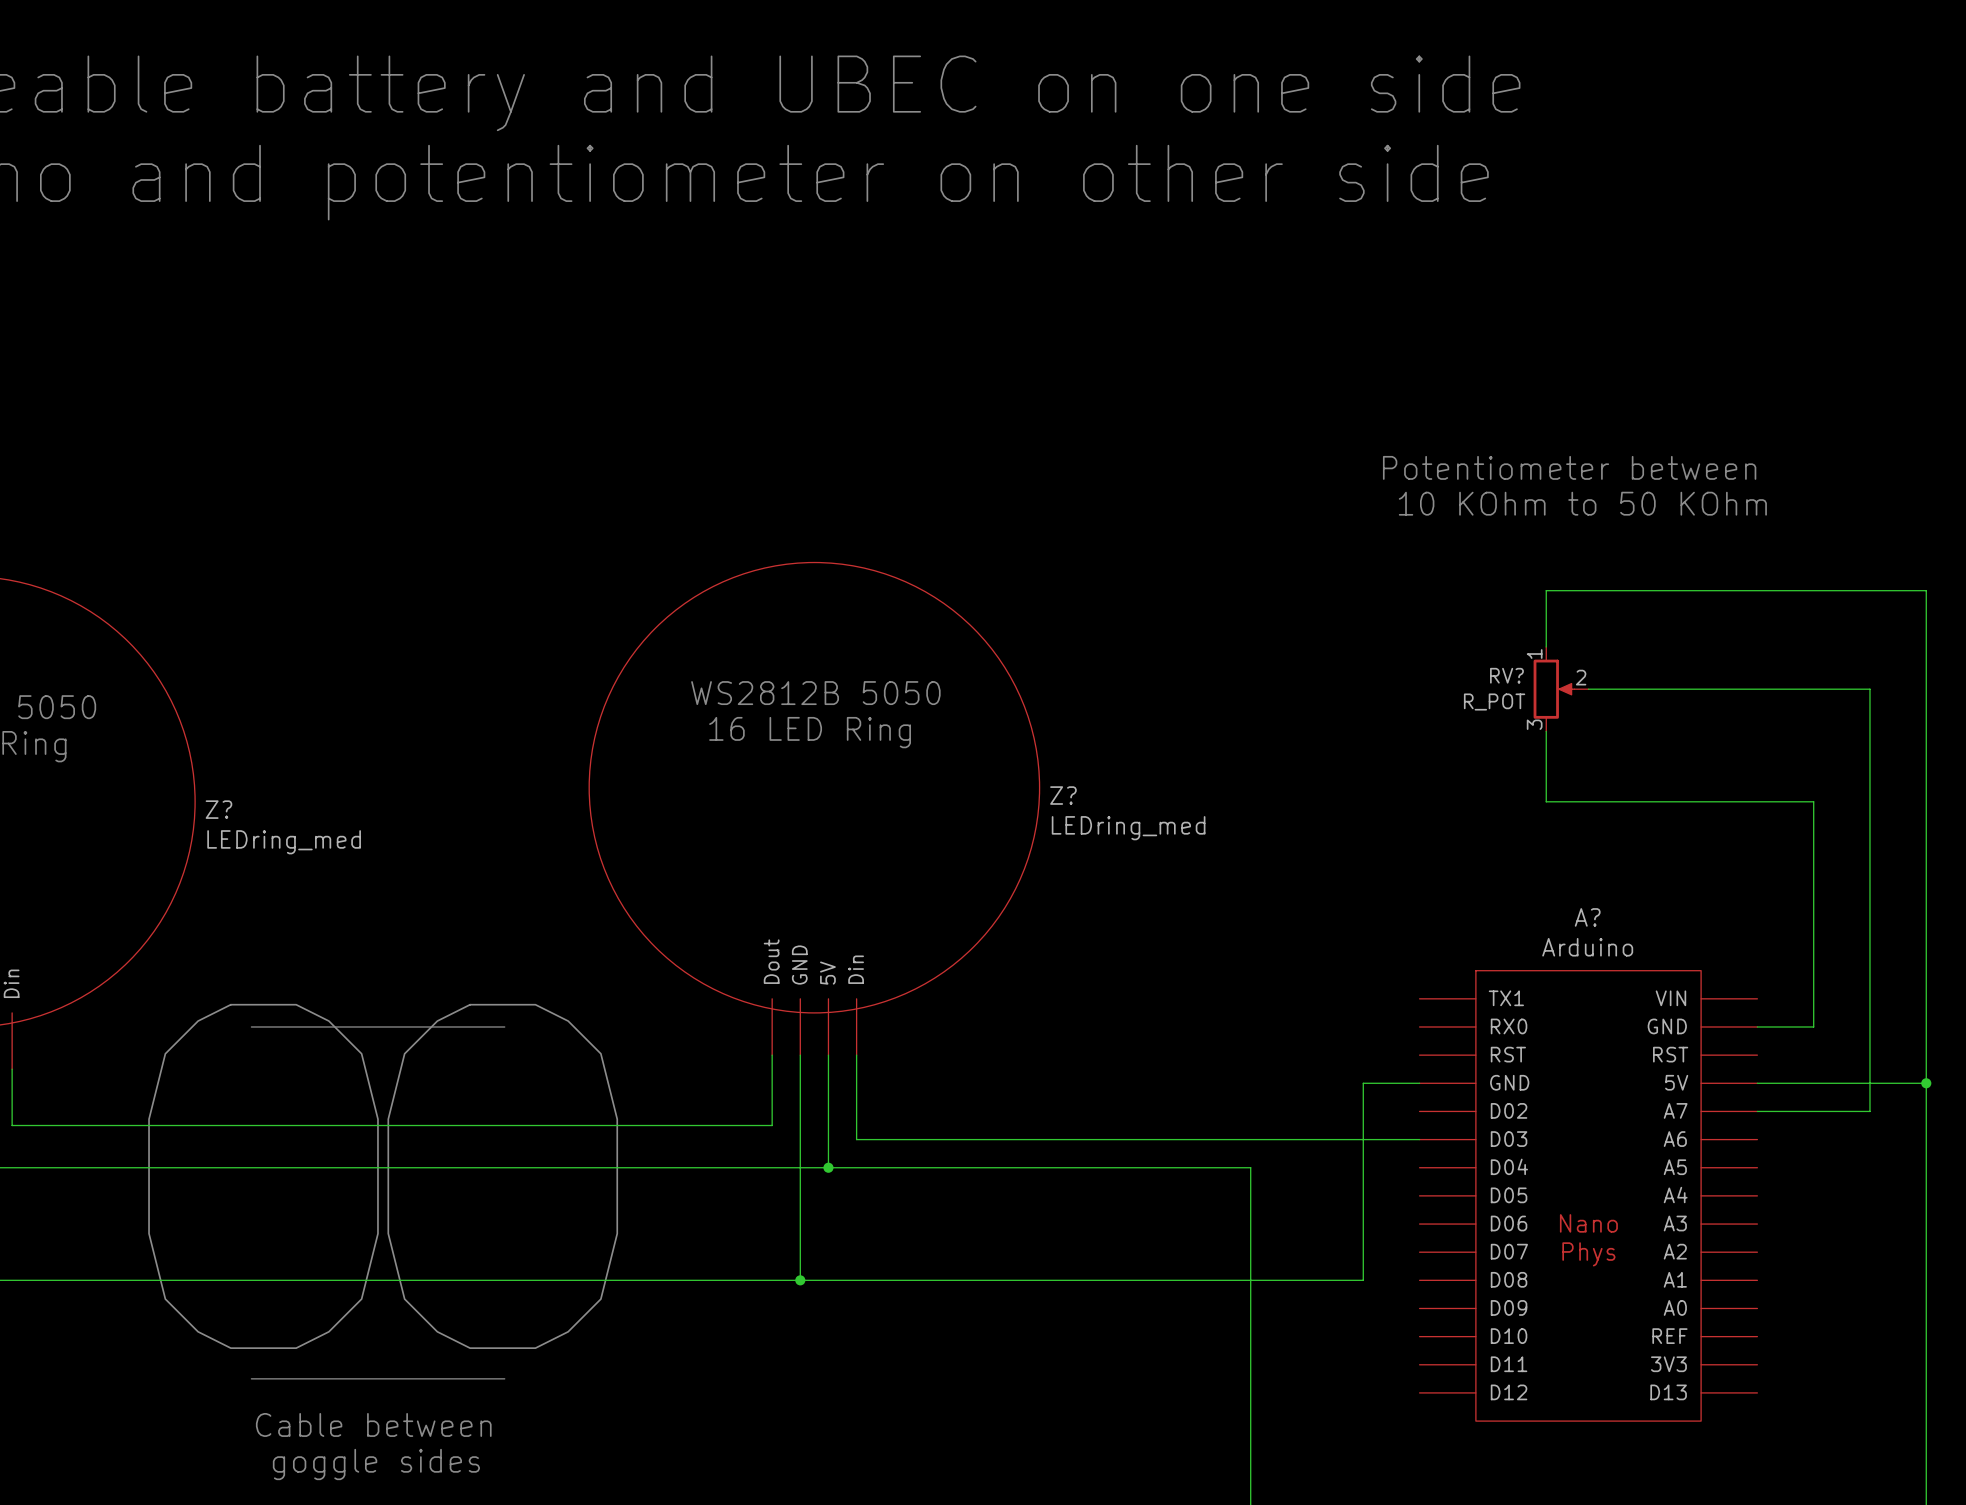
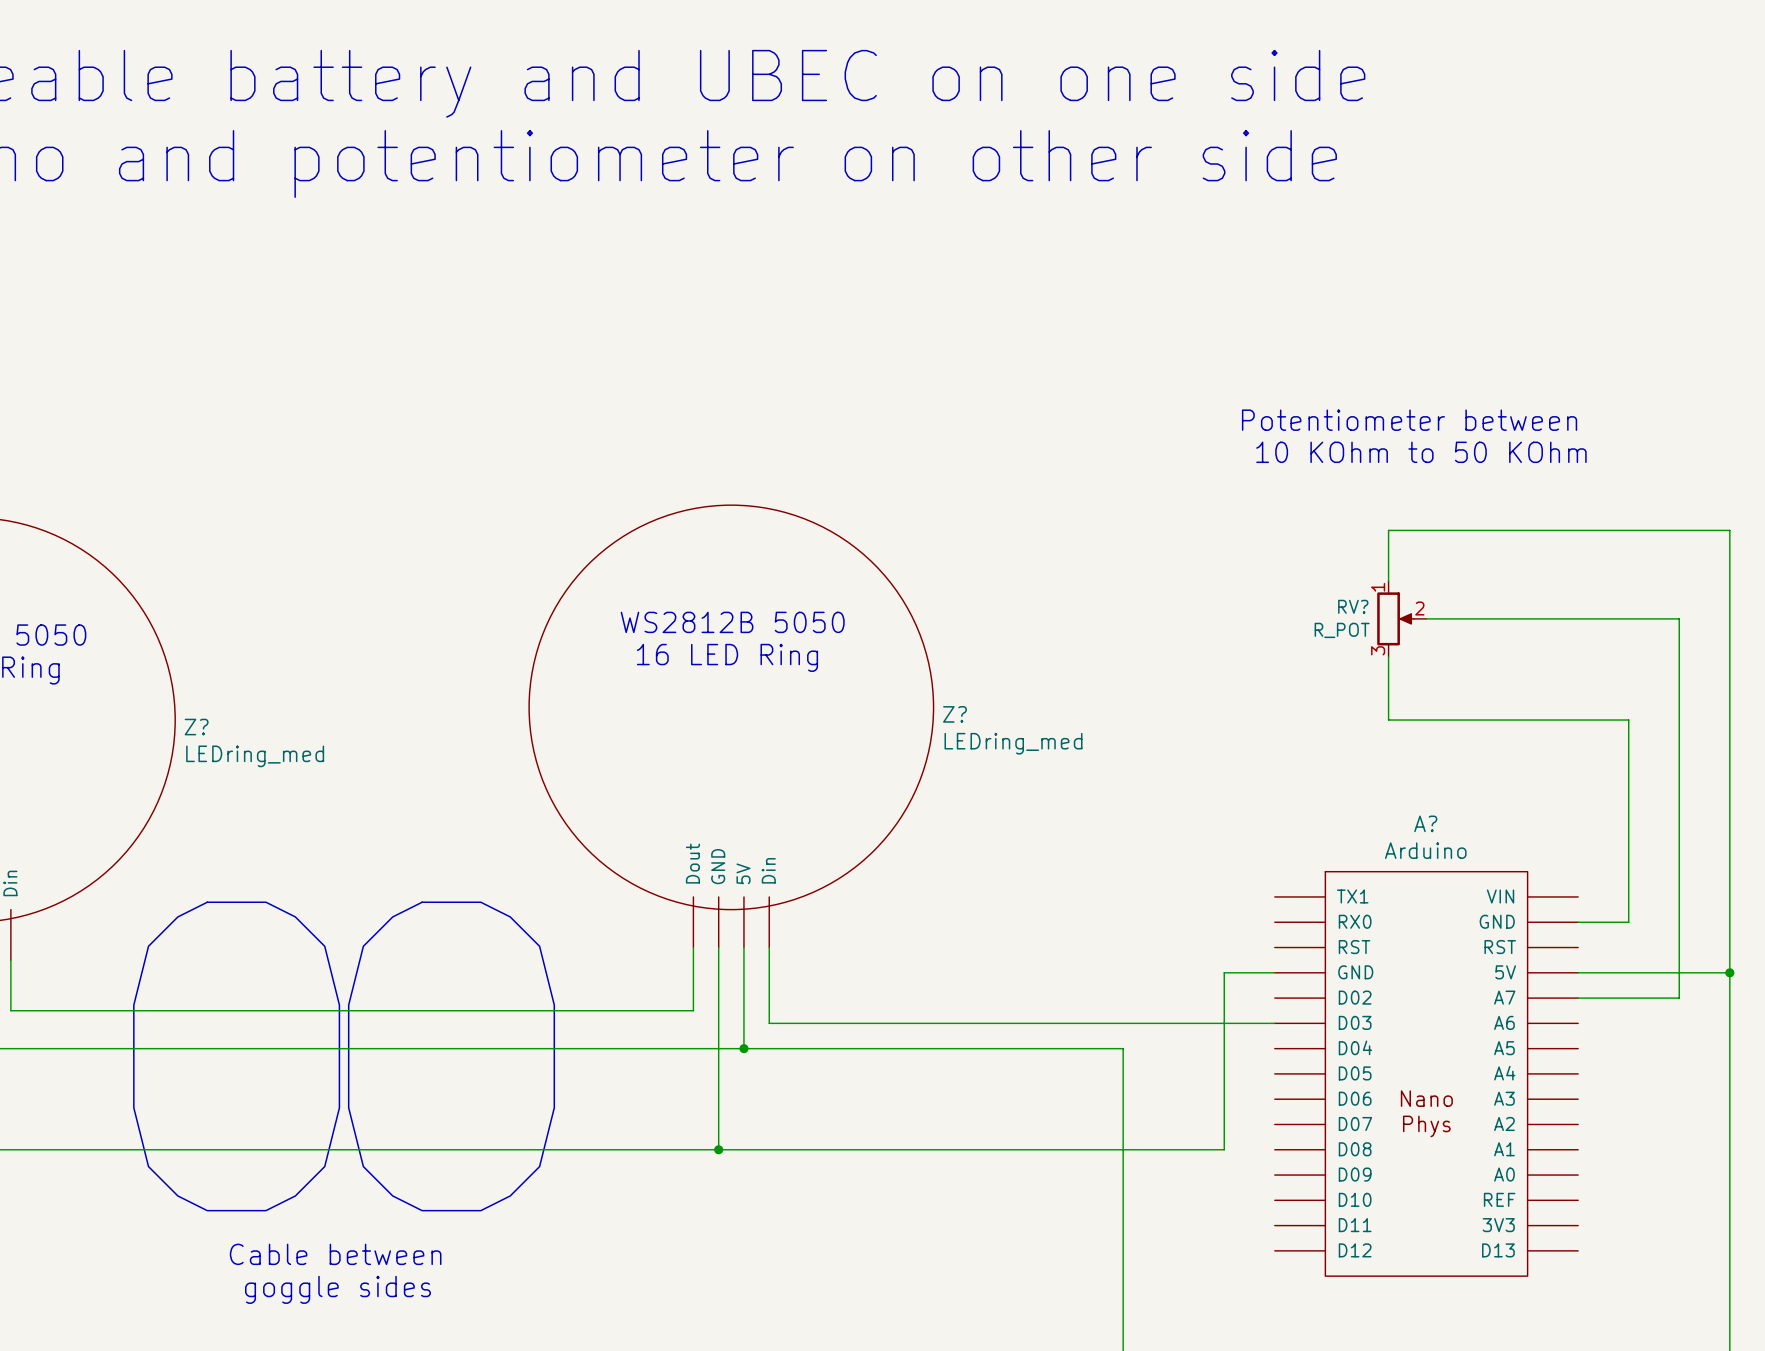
bus: (251, 1026) (504, 1026) -> none
bus: (251, 1378) (504, 1378) -> none
text position: Cable between (373, 1424) -> Cable between (335, 1254)
text position: goggle sides (376, 1464) -> goggle sides (338, 1289)

